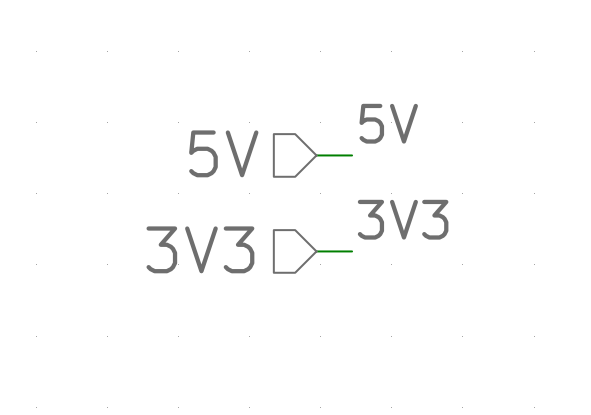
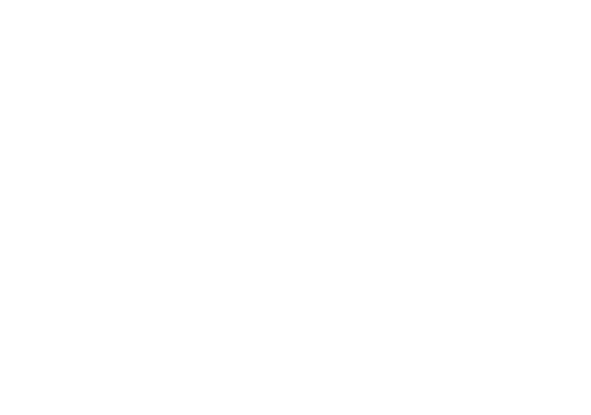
label: 5V (388, 123) -> none
hierarchical label: 5V (223, 153) -> none
wire: (316, 155) (352, 155) -> none
label: 3V3 (403, 219) -> none
hierarchical label: 3V3 (200, 249) -> none
wire: (316, 251) (352, 251) -> none

